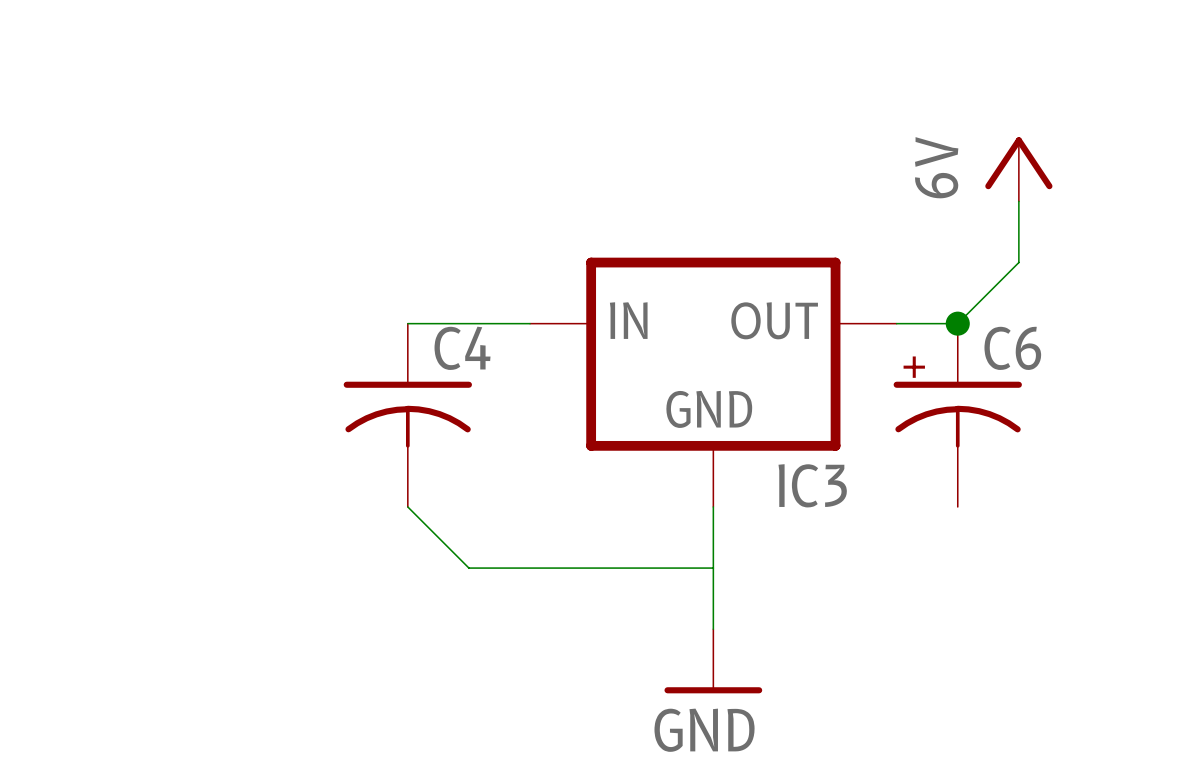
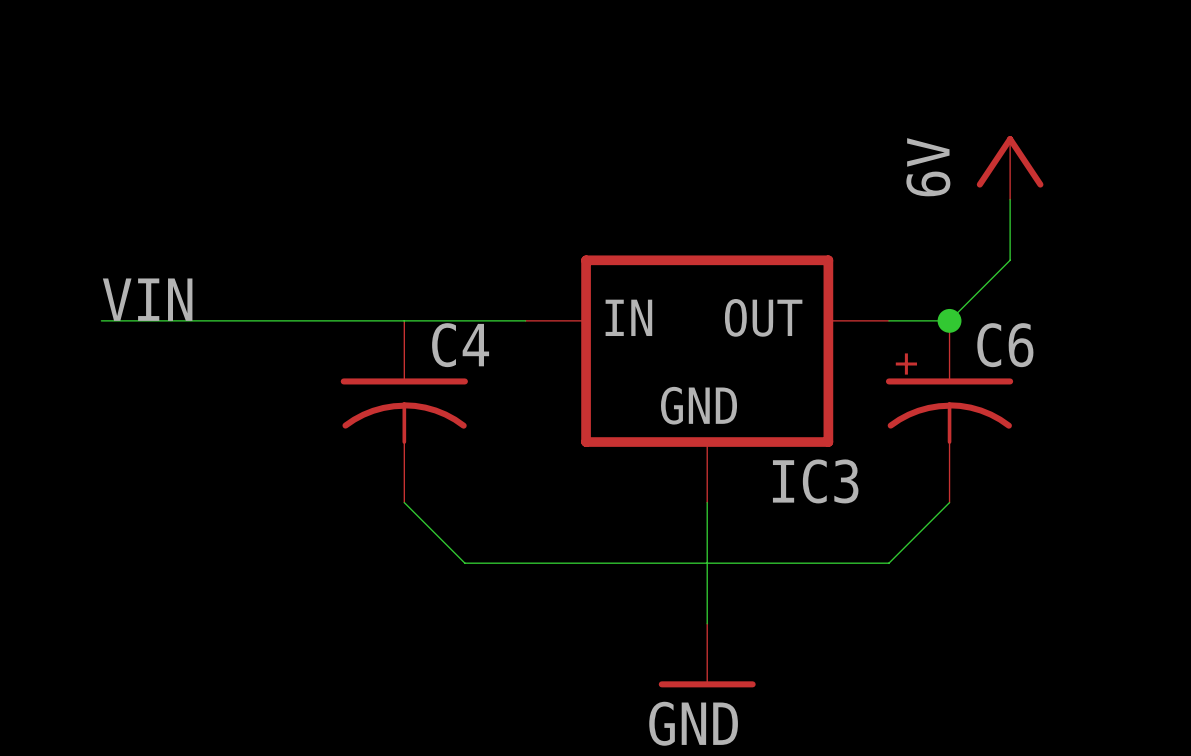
label: none -> VIN (147, 299)
wire: none -> (101, 320) (404, 320)
wire: none -> (949, 502) (888, 563) (707, 563)

